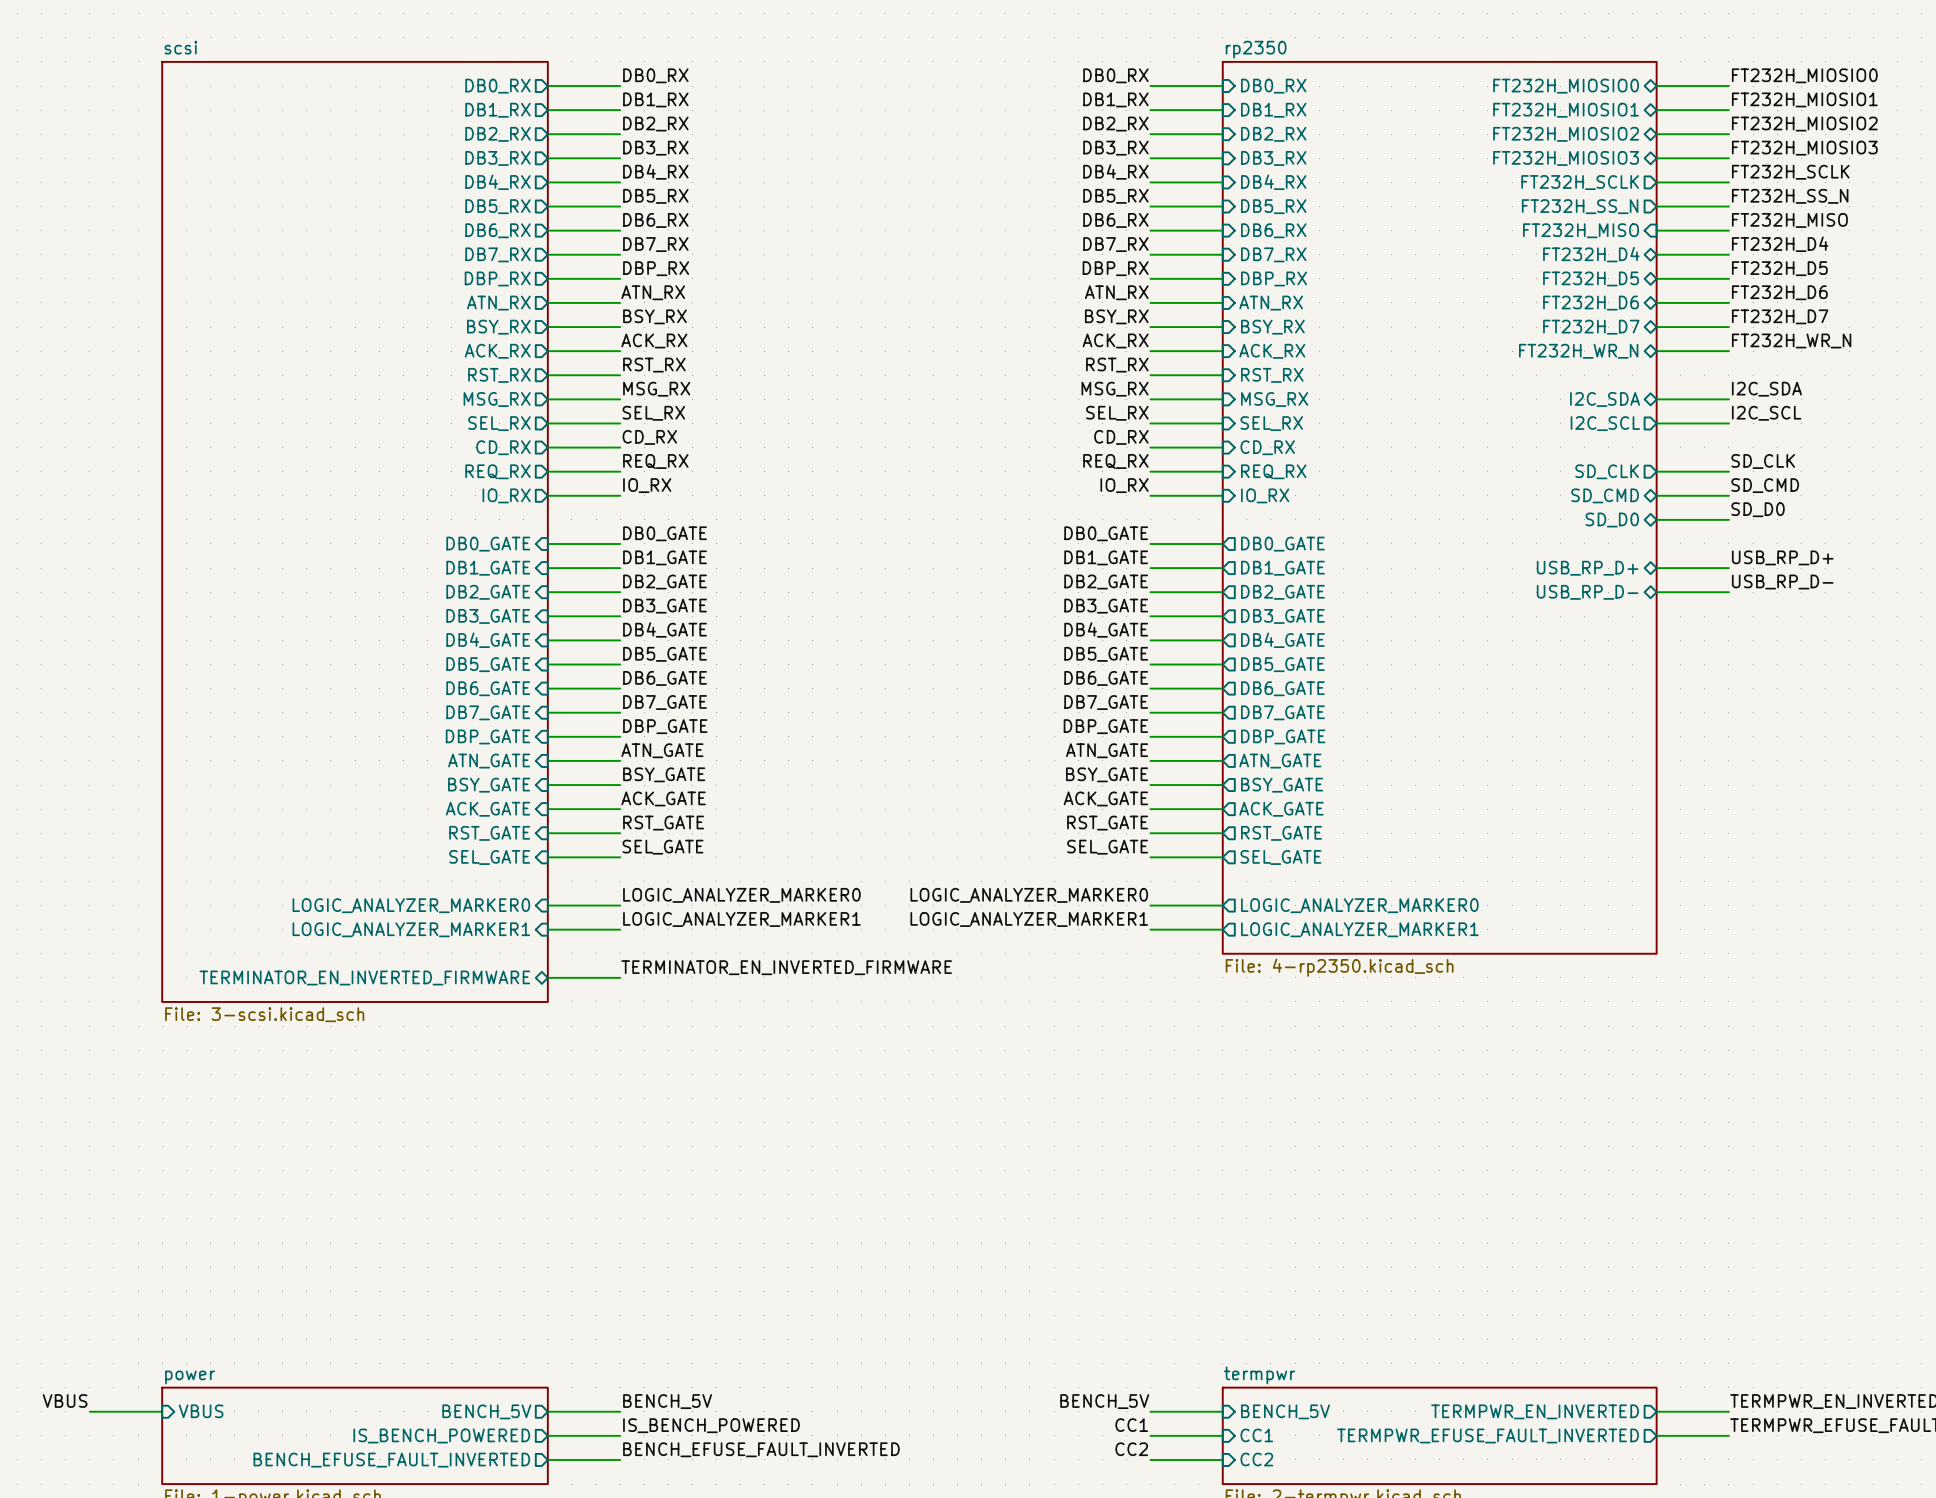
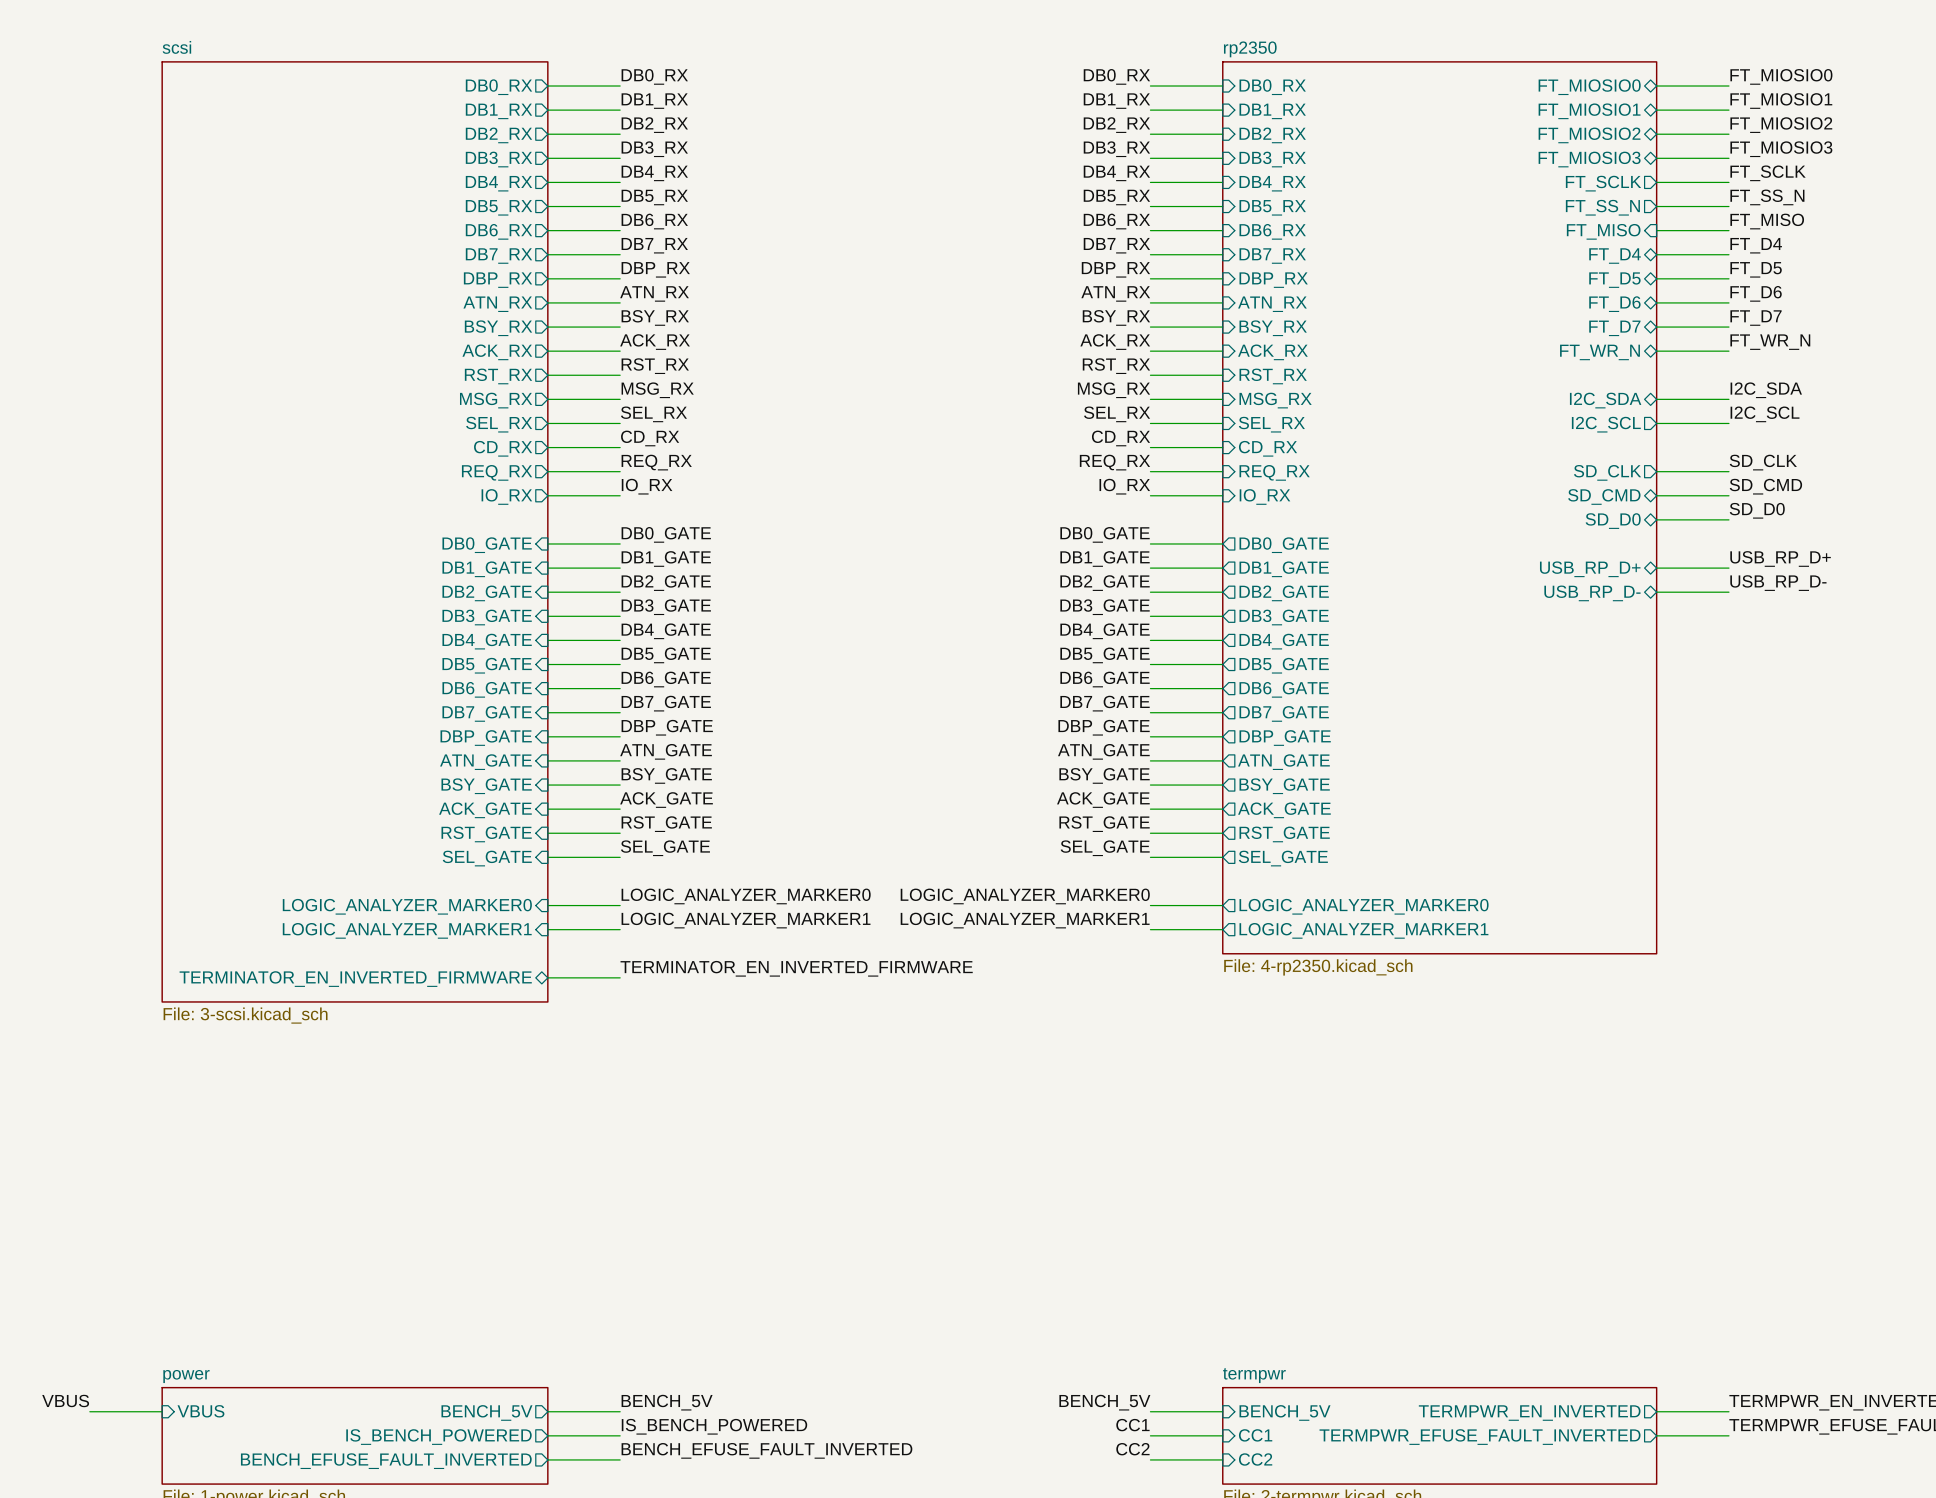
label: FT232H_MIOSIO0 (1804, 75) -> FT_MIOSIO0 (1781, 76)
sheet pin: FT232H_MIOSIO0 (1566, 86) -> FT_MIOSIO0 (1589, 87)
label: FT232H_MIOSIO1 (1804, 99) -> FT_MIOSIO1 (1781, 101)
sheet pin: FT232H_MIOSIO1 (1566, 110) -> FT_MIOSIO1 (1589, 111)
label: FT232H_MIOSIO2 (1804, 124) -> FT_MIOSIO2 (1781, 125)
sheet pin: FT232H_MIOSIO2 (1566, 134) -> FT_MIOSIO2 (1589, 135)
label: FT232H_MIOSIO3 (1804, 148) -> FT_MIOSIO3 (1781, 149)
sheet pin: FT232H_MIOSIO3 (1566, 158) -> FT_MIOSIO3 (1589, 159)
label: FT232H_SCLK (1790, 172) -> FT_SCLK (1768, 173)
sheet pin: FT232H_SCLK (1580, 182) -> FT_SCLK (1603, 183)
label: FT232H_SS_N (1790, 196) -> FT_SS_N (1767, 197)
sheet pin: FT232H_SS_N (1580, 206) -> FT_SS_N (1602, 207)
label: FT232H_MISO (1789, 220) -> FT_MISO (1767, 221)
sheet pin: FT232H_MISO (1580, 230) -> FT_MISO (1603, 231)
label: FT232H_D4 (1780, 244) -> FT_D4 (1756, 245)
sheet pin: FT232H_D4 (1591, 254) -> FT_D4 (1615, 256)
label: FT232H_D5 (1779, 268) -> FT_D5 (1756, 269)
sheet pin: FT232H_D5 (1591, 278) -> FT_D5 (1614, 280)
label: FT232H_D6 (1779, 292) -> FT_D6 (1756, 293)
sheet pin: FT232H_D6 (1591, 303) -> FT_D6 (1614, 304)
label: FT232H_D7 (1780, 316) -> FT_D7 (1756, 318)
sheet pin: FT232H_D7 (1591, 327) -> FT_D7 (1614, 328)
label: FT232H_WR_N (1791, 340) -> FT_WR_N (1770, 342)
sheet pin: FT232H_WR_N (1578, 351) -> FT_WR_N (1599, 352)

